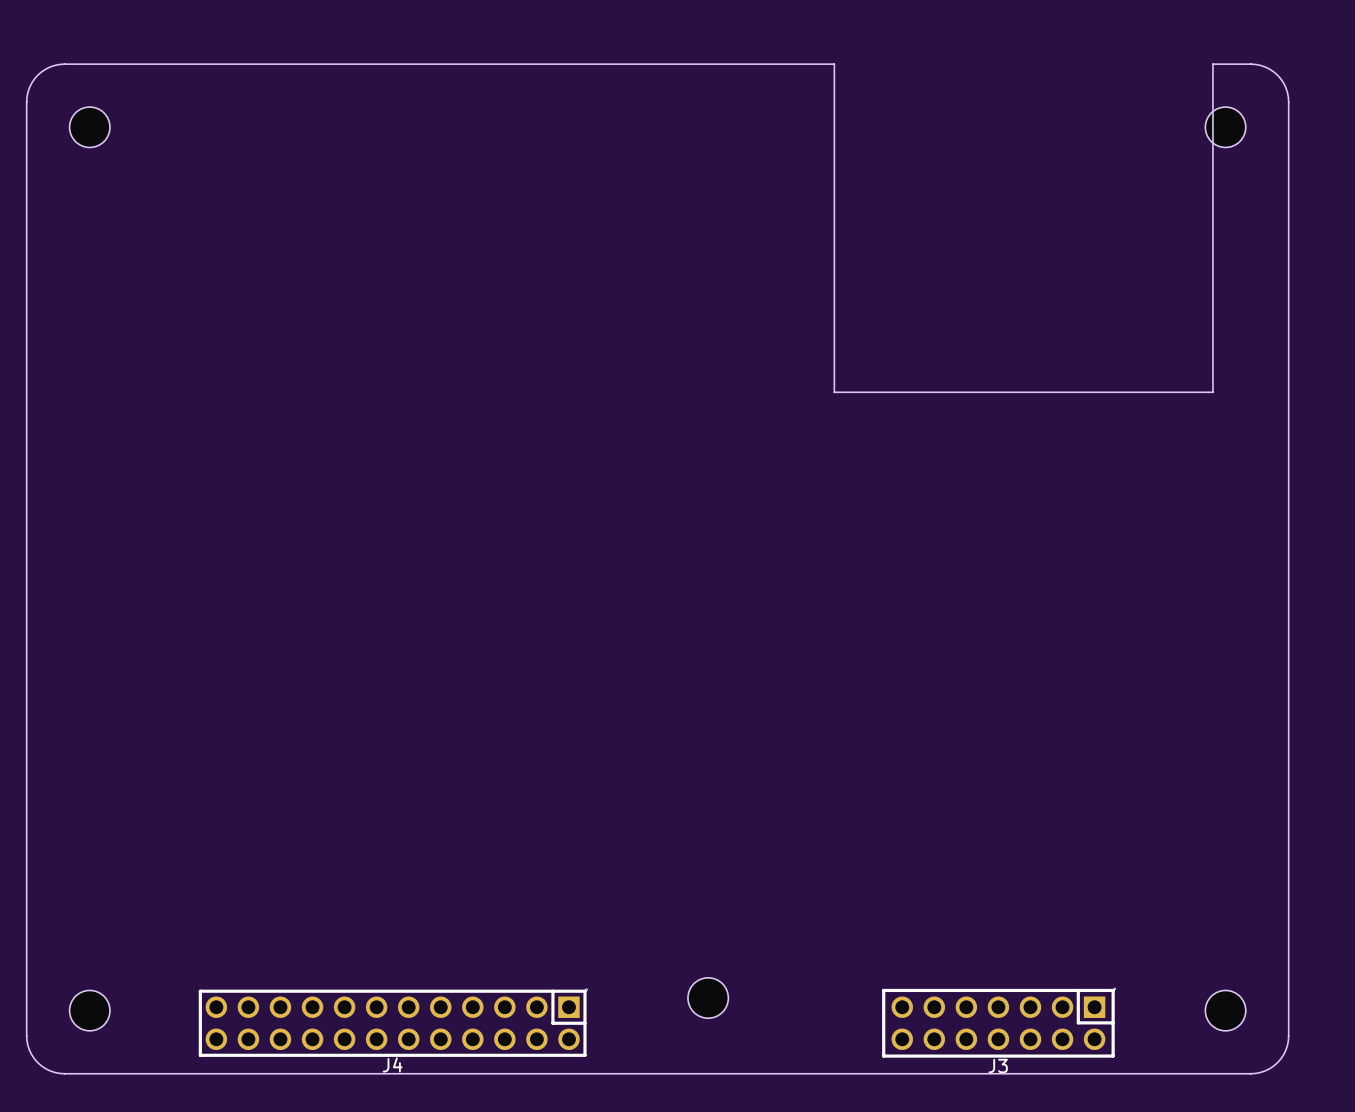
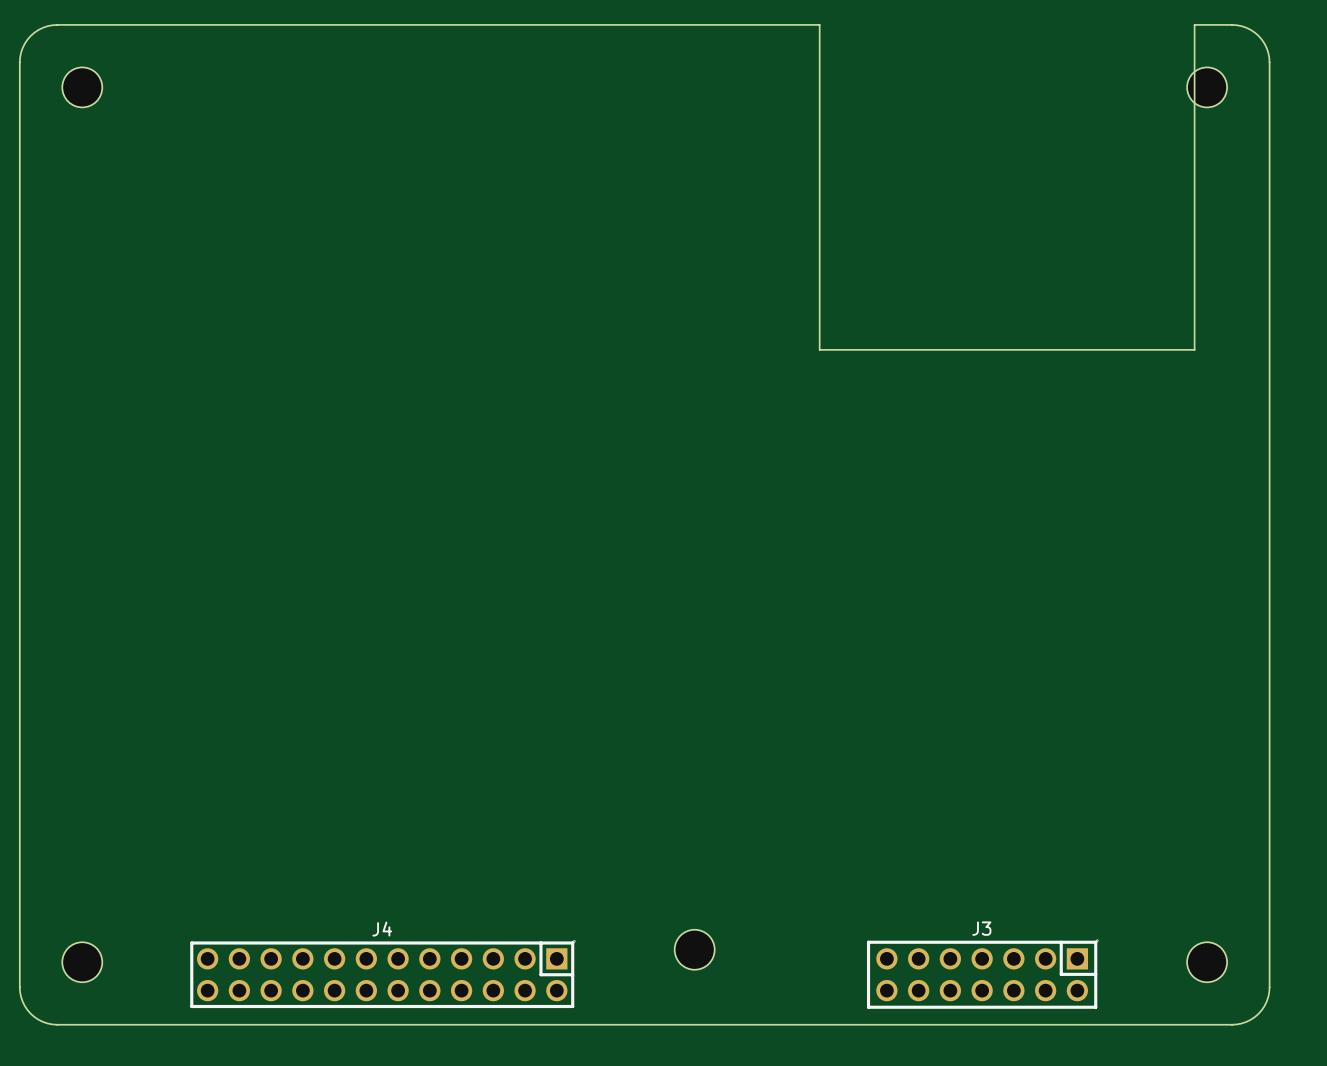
J4 name position: J4 (392, 1064) -> J4 (382, 929)
J3 name position: J3 (998, 1066) -> J3 (981, 928)

